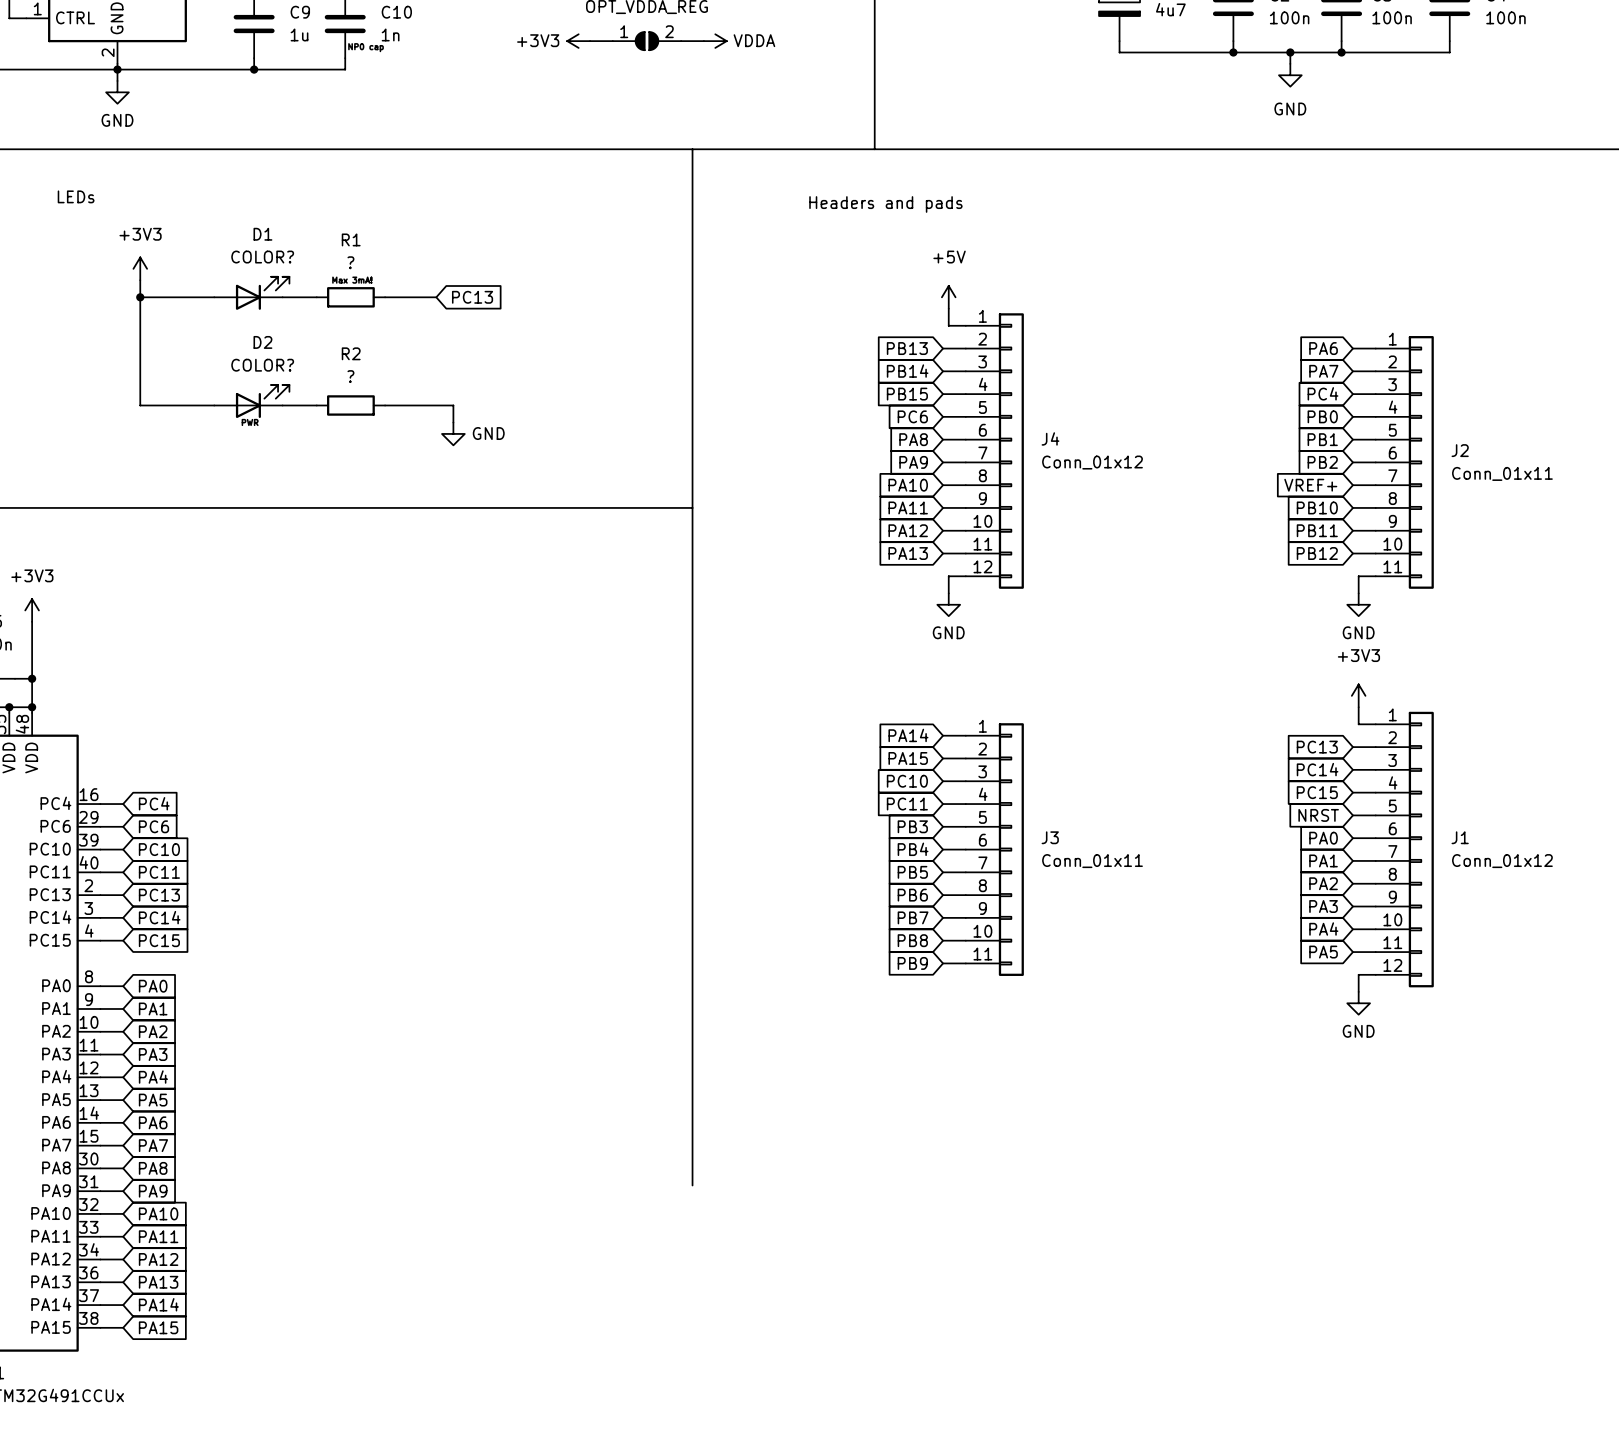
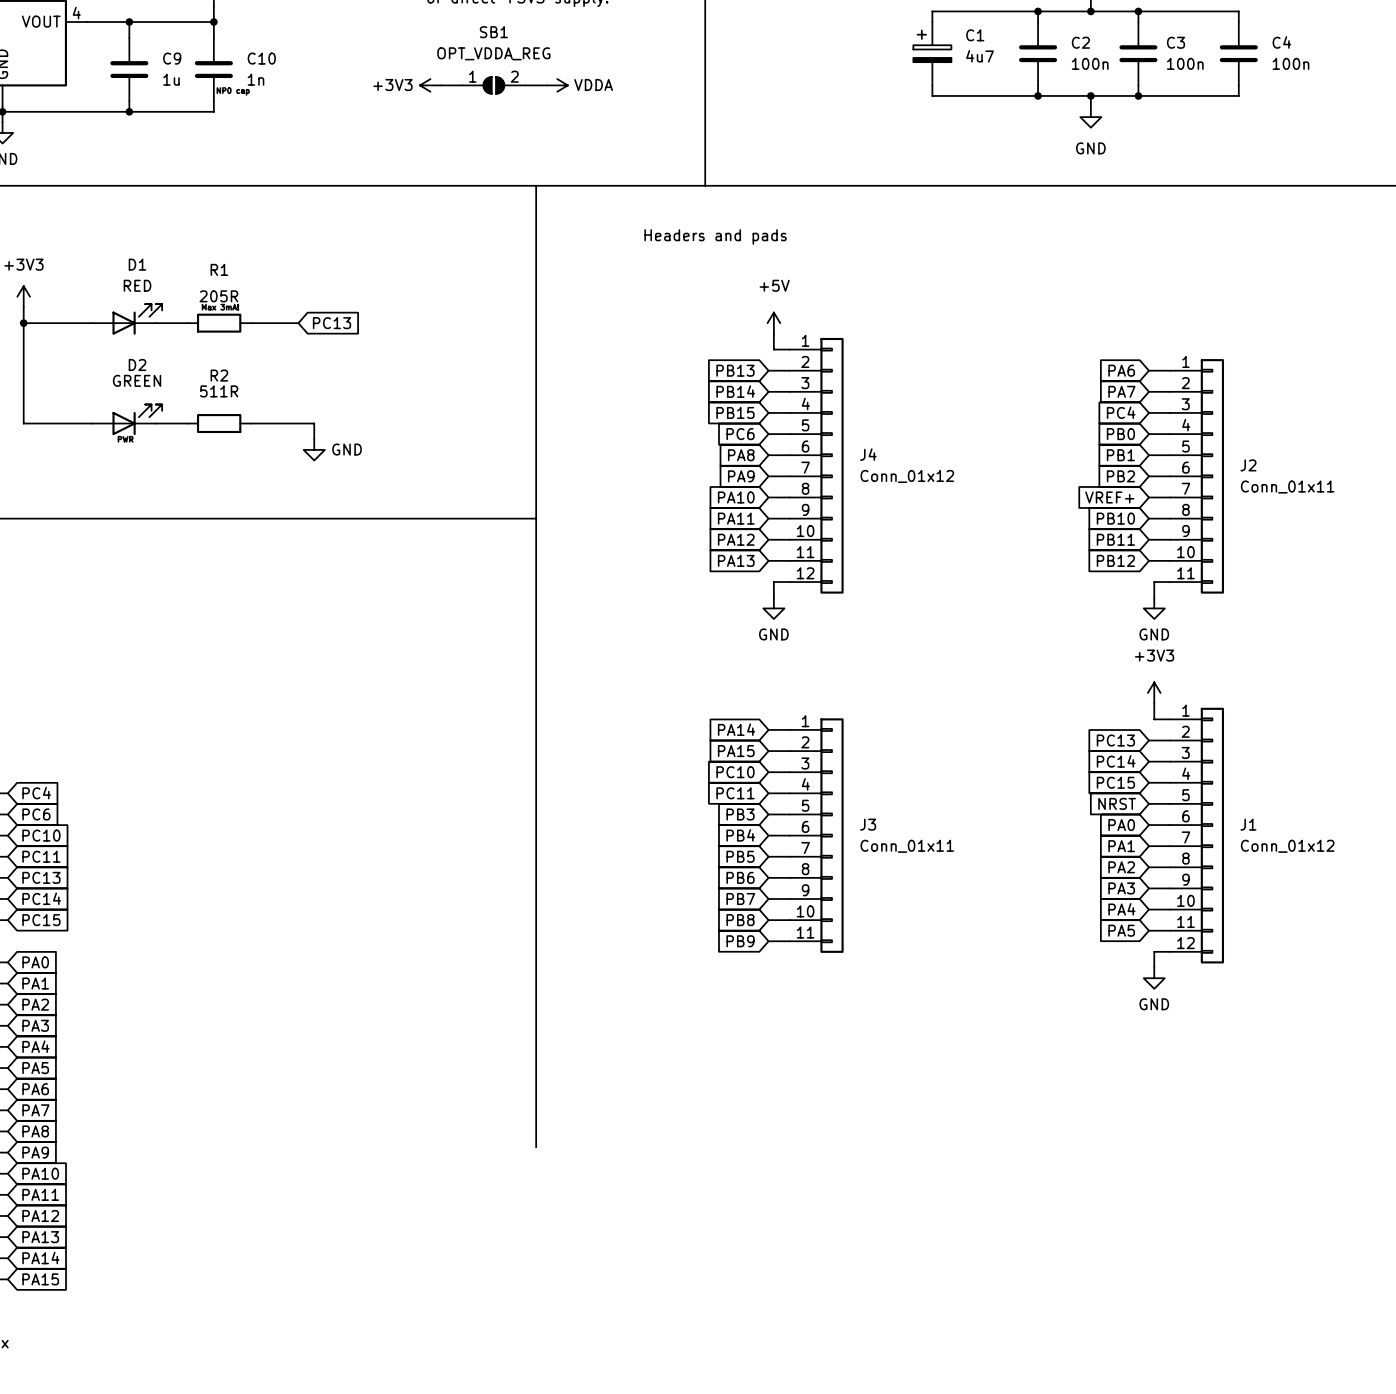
D1 value: COLOR? (262, 257) -> RED (137, 285)
R1 value: ? (350, 262) -> 205R (218, 296)
D2 value: COLOR? (262, 365) -> GREEN (137, 380)
R2 value: ? (350, 376) -> 511R (219, 391)

